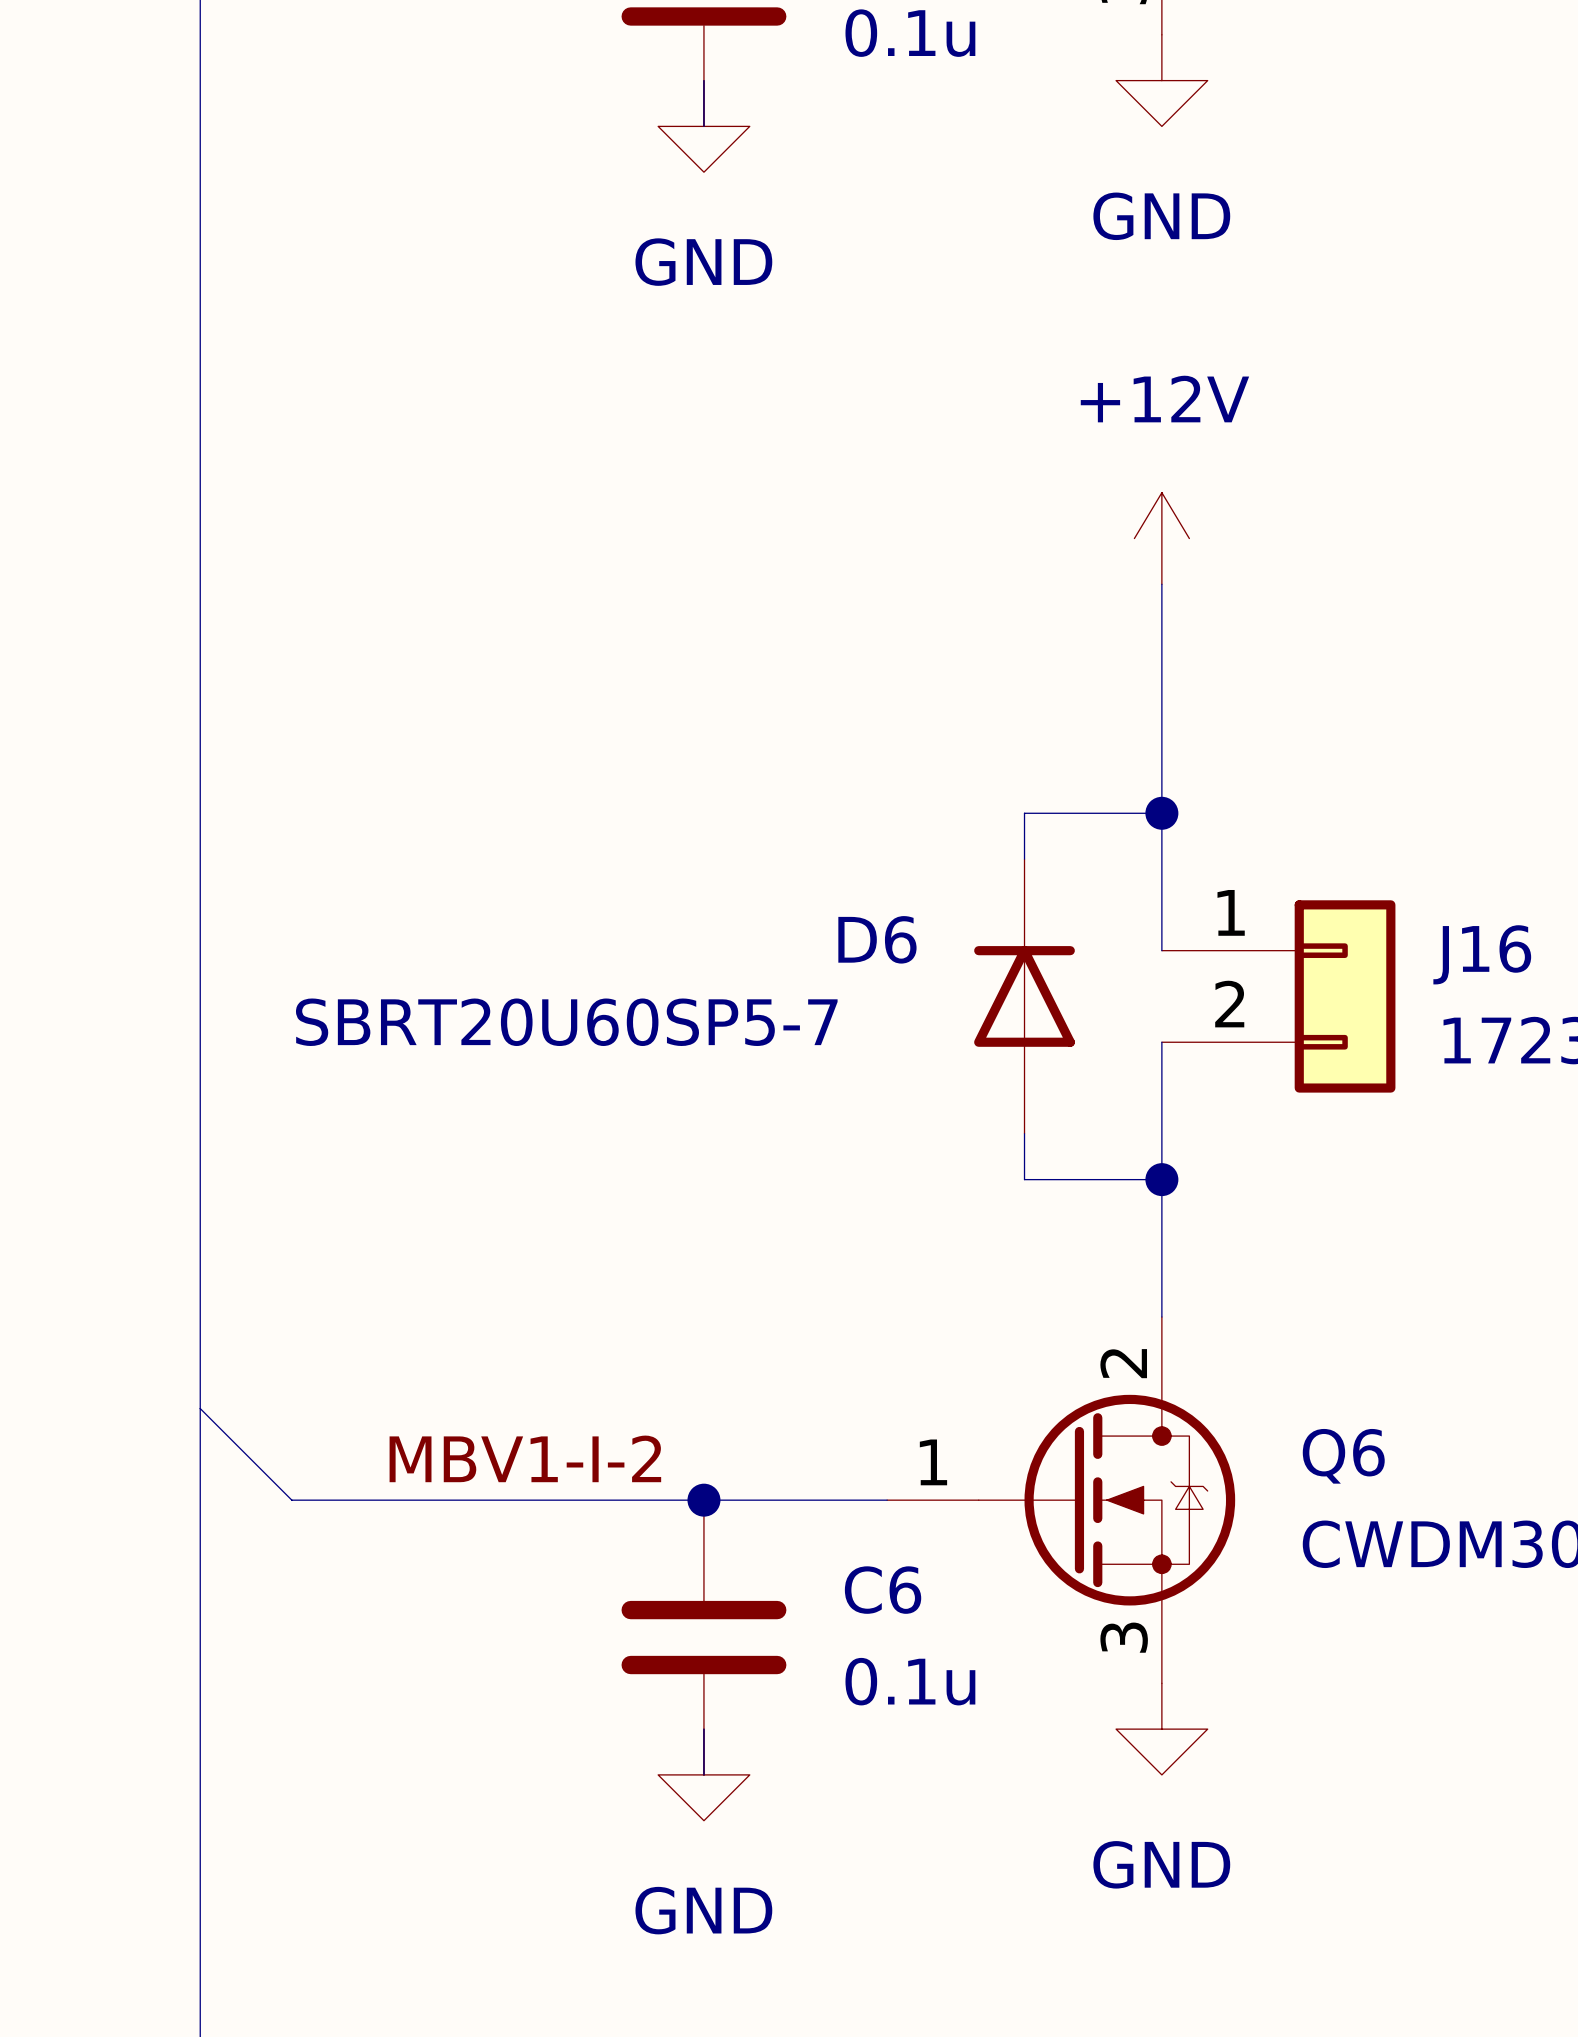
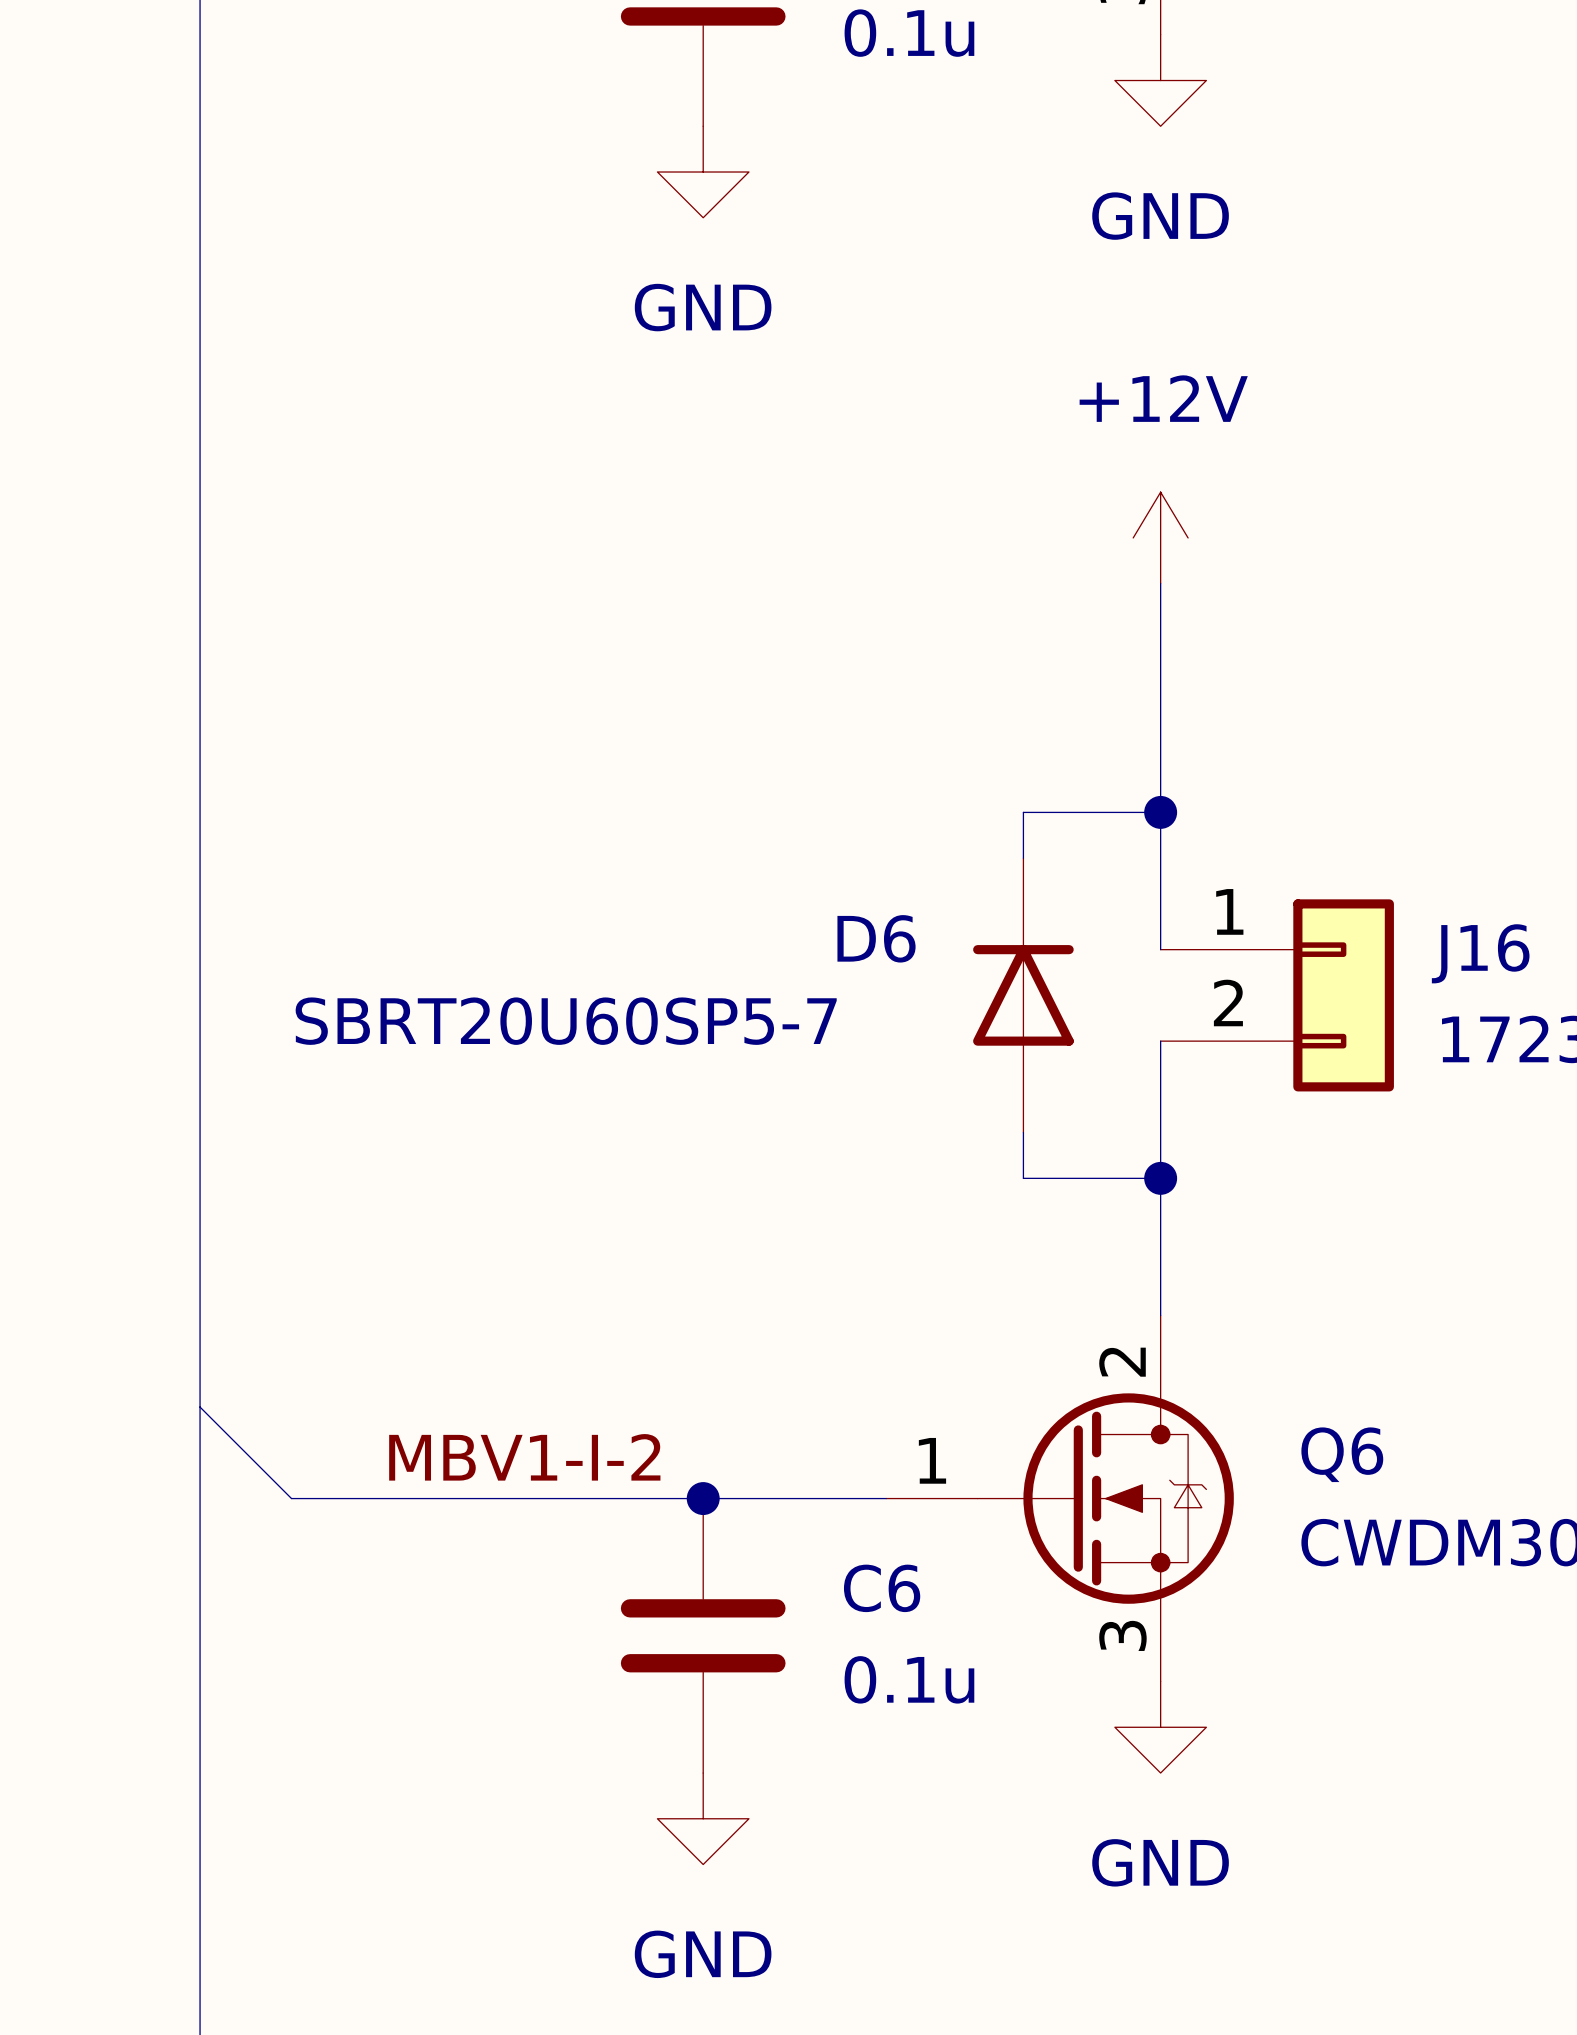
power symbol position: GND (703, 126) -> GND (703, 172)
power symbol position: GND (703, 1774) -> GND (703, 1818)

